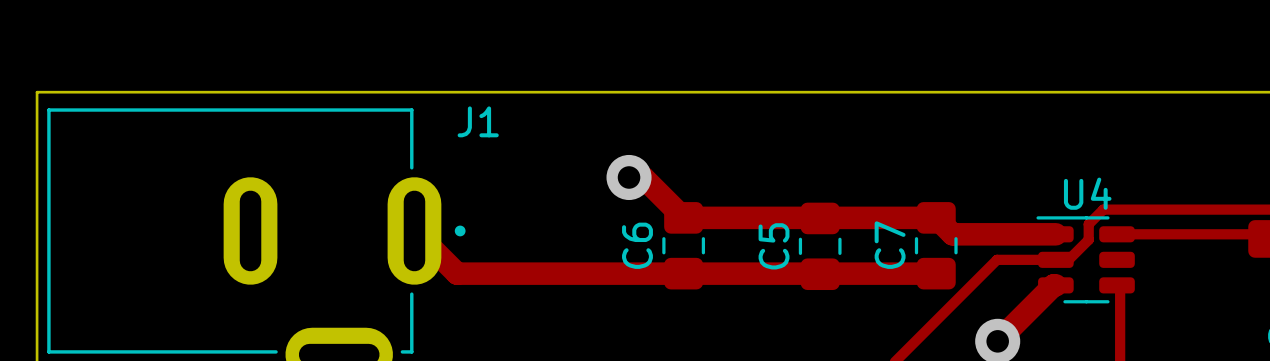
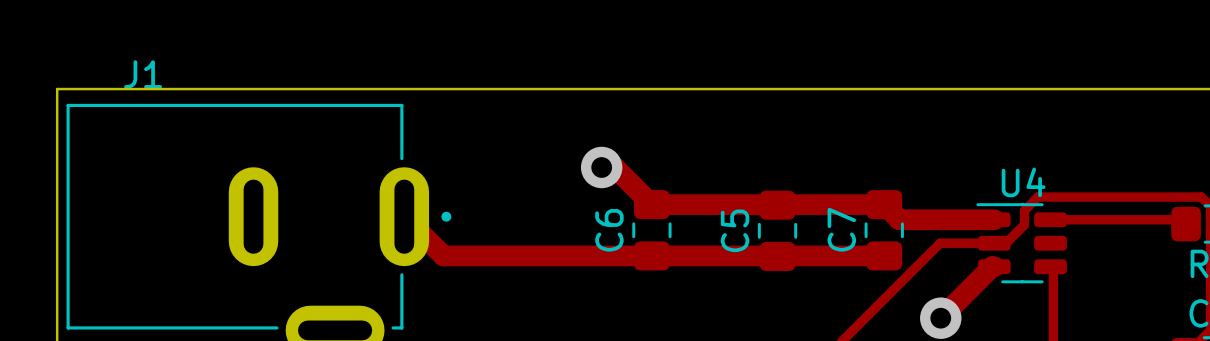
J1 name position: J1 (478, 121) -> J1 (143, 74)

